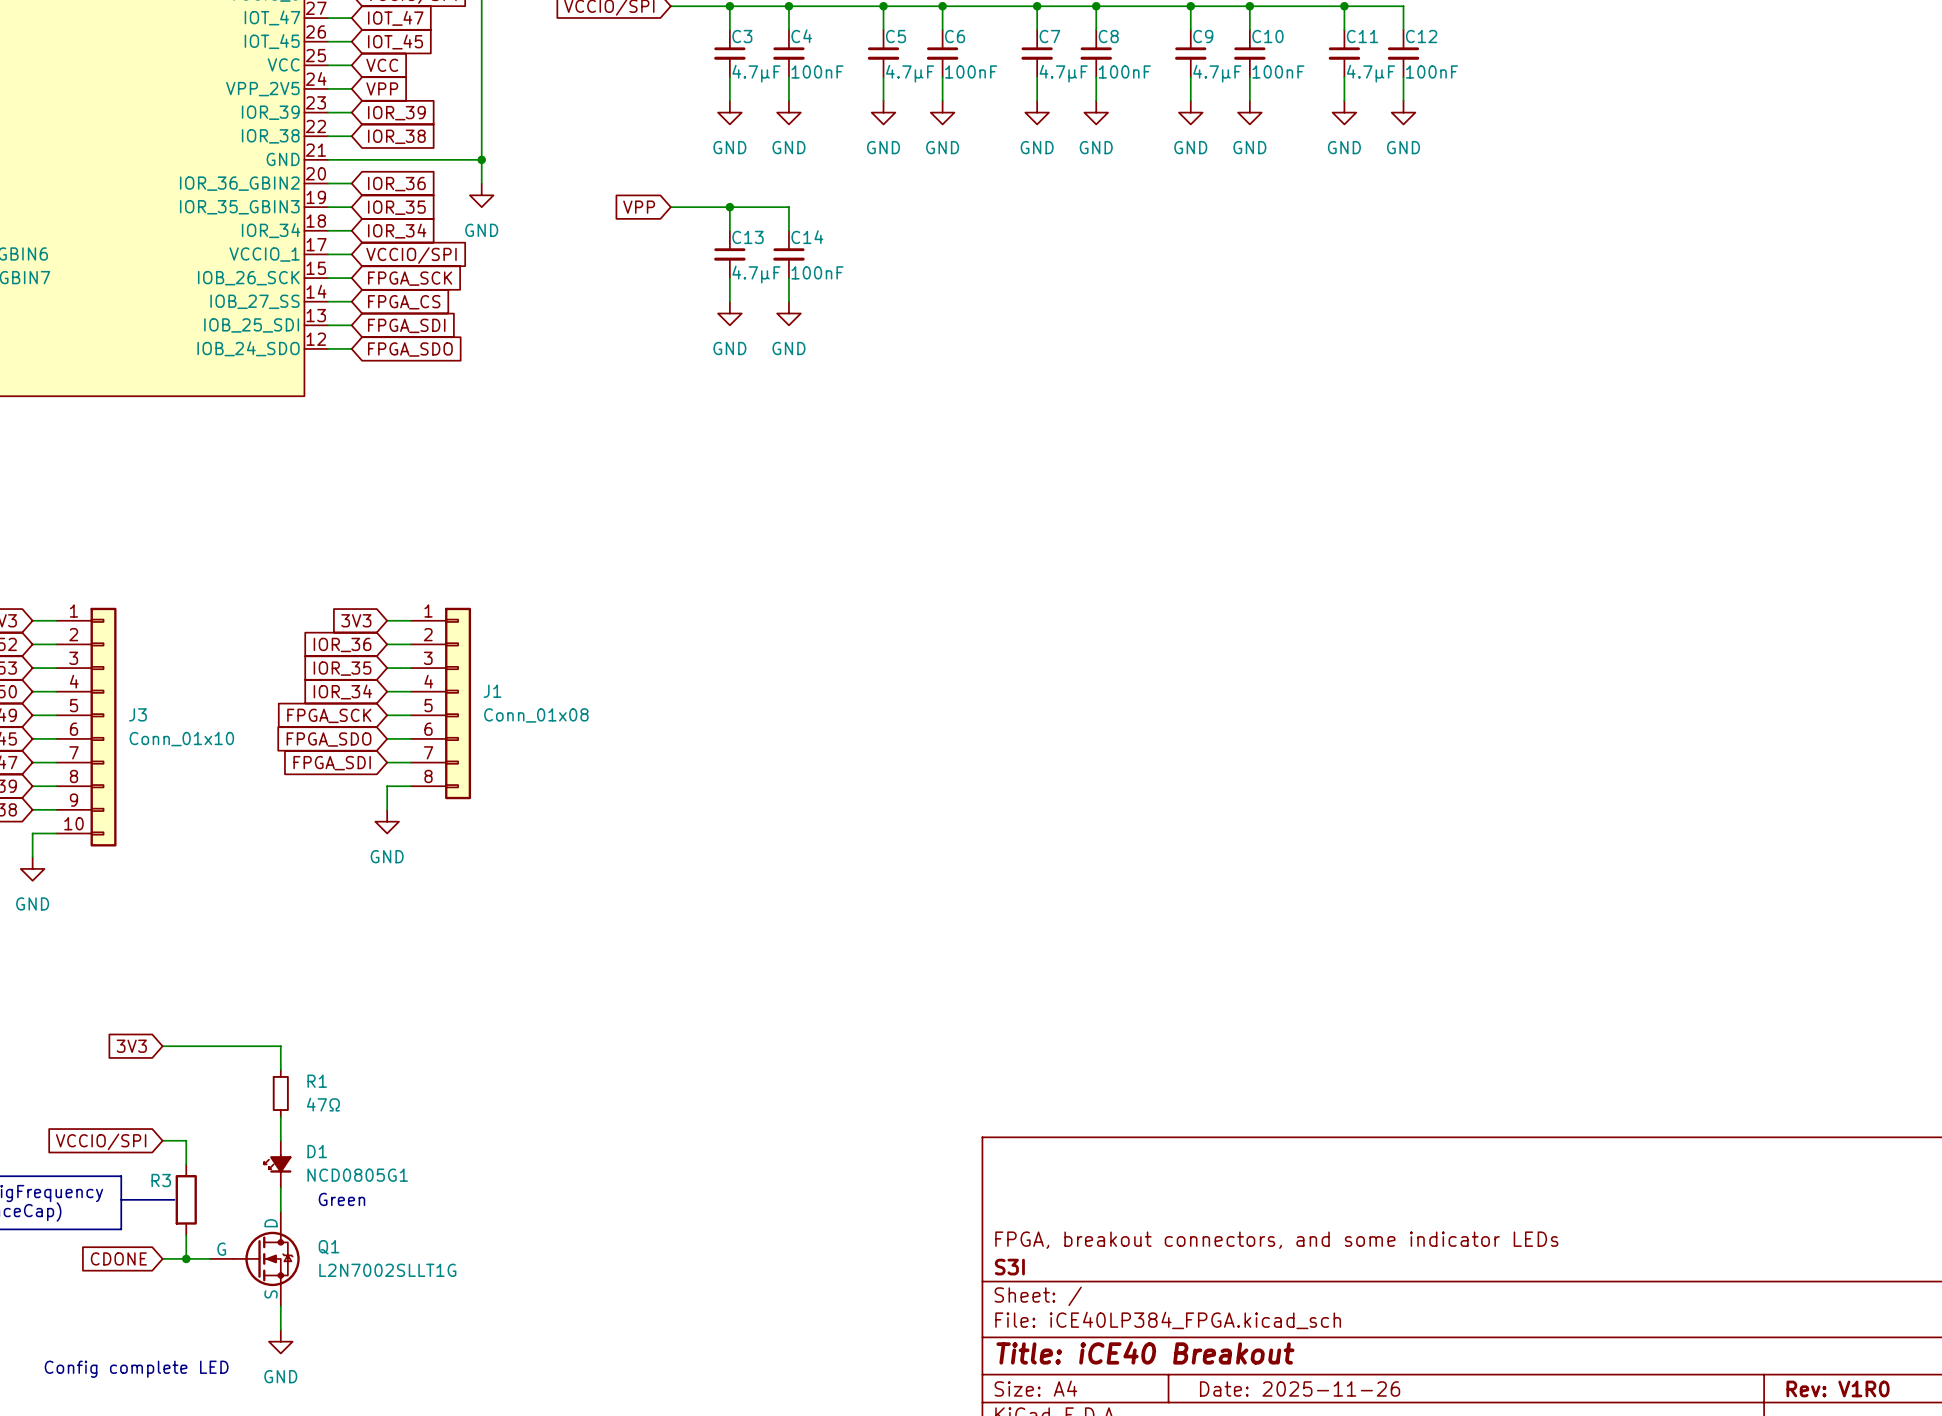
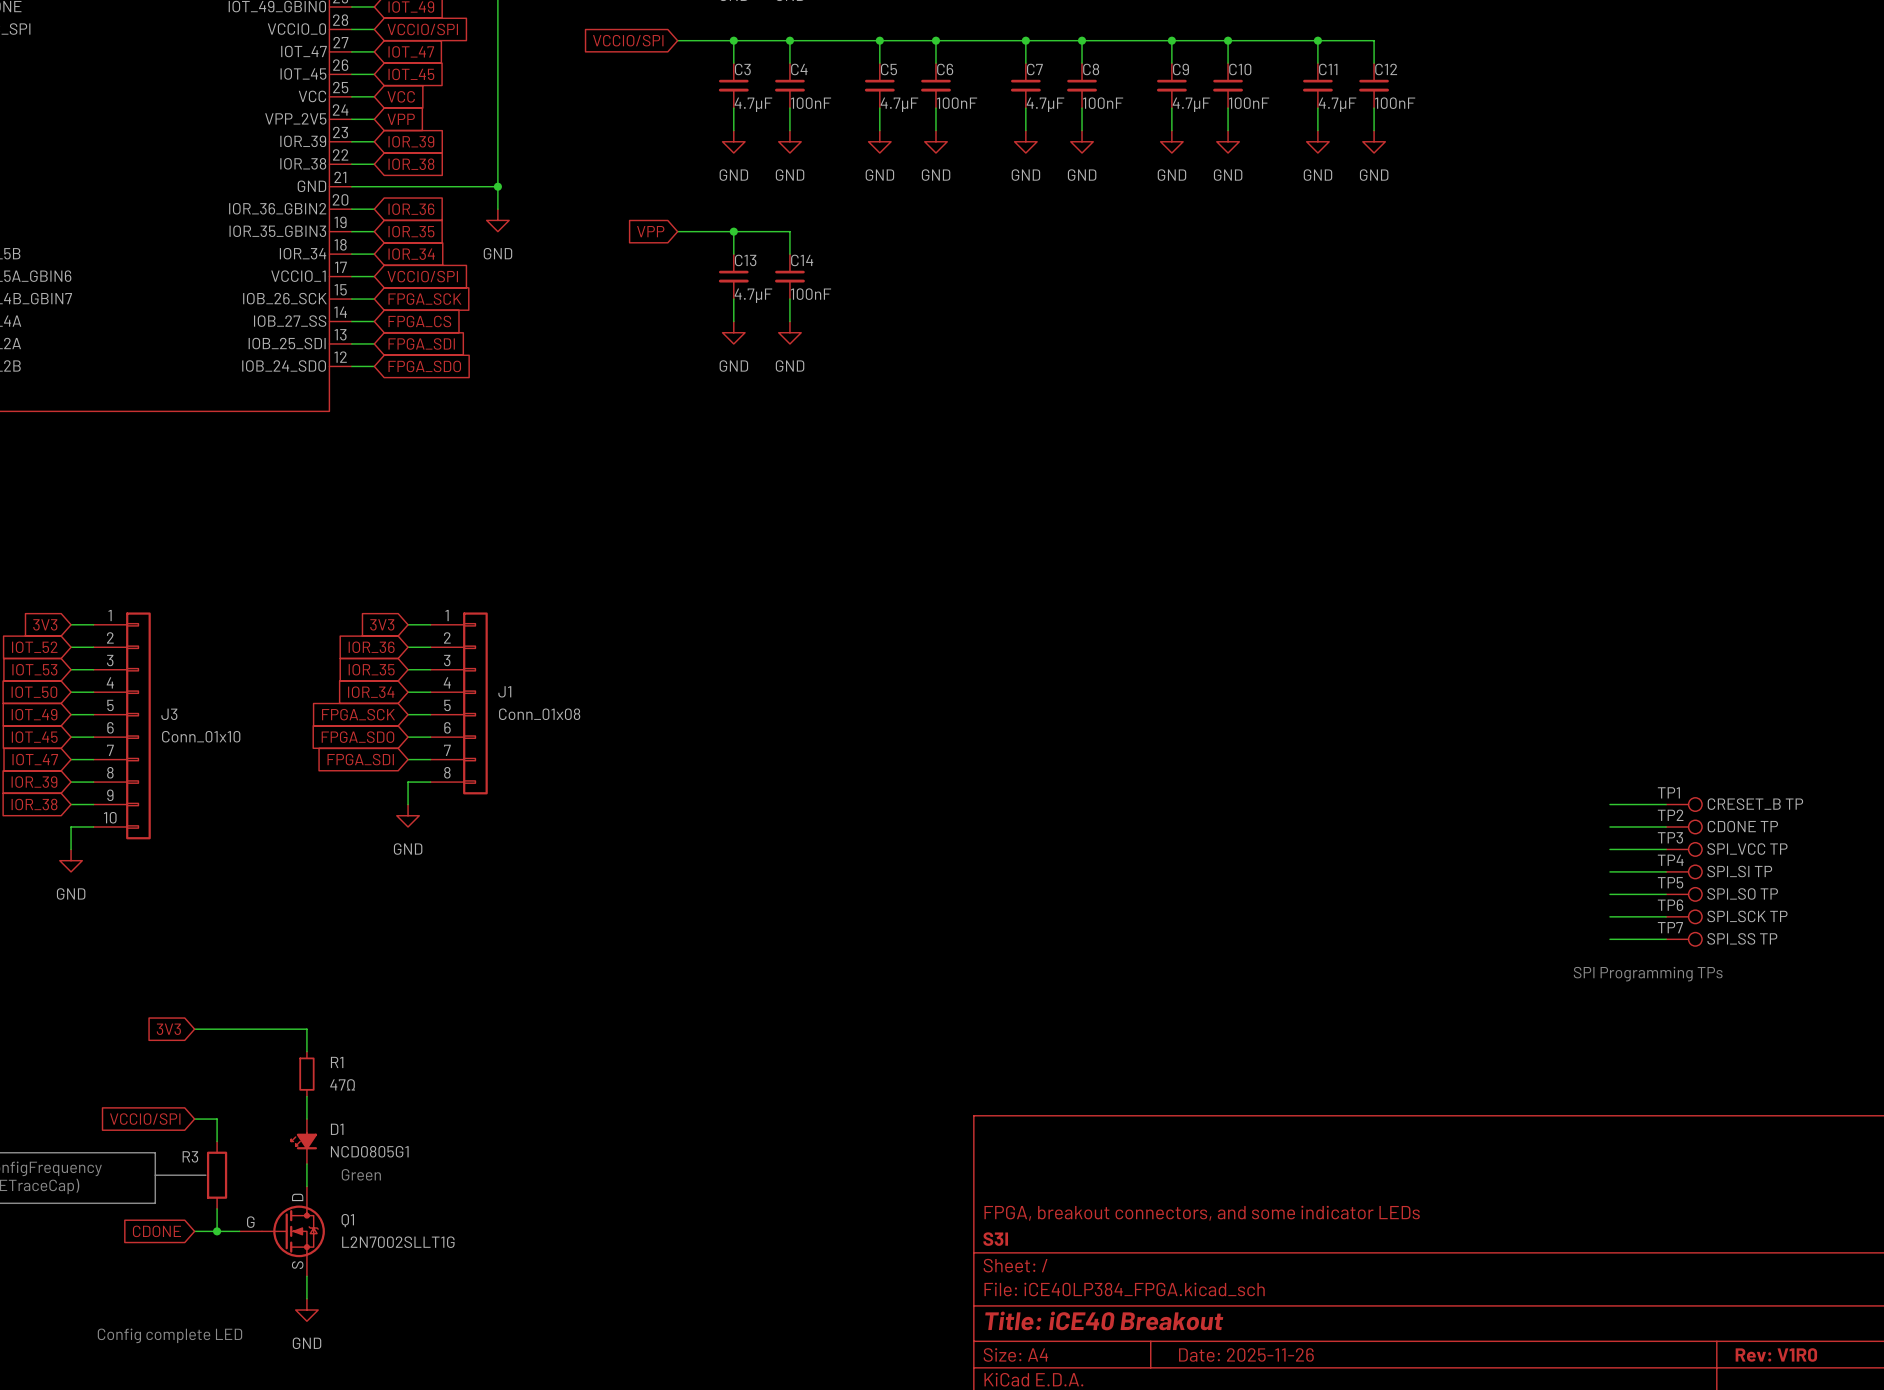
wire: none -> (1609, 804) (1666, 804)
TP1: none -> CRESET_B TP (1684, 804)
wire: none -> (1609, 826) (1666, 826)
TP2: none -> CDONE TP (1684, 826)
wire: none -> (1609, 849) (1666, 849)
TP3: none -> SPI_VCC TP (1684, 849)
wire: none -> (1609, 871) (1666, 871)
TP4: none -> SPI_SI TP (1684, 871)
wire: none -> (1609, 894) (1666, 894)
TP5: none -> SPI_SO TP (1684, 894)
wire: none -> (1609, 916) (1666, 916)
TP6: none -> SPI_SCK TP (1684, 916)
wire: none -> (1609, 939) (1666, 939)
TP7: none -> SPI_SS TP (1684, 939)
text: none -> SPI Programming TPs (1648, 974)

